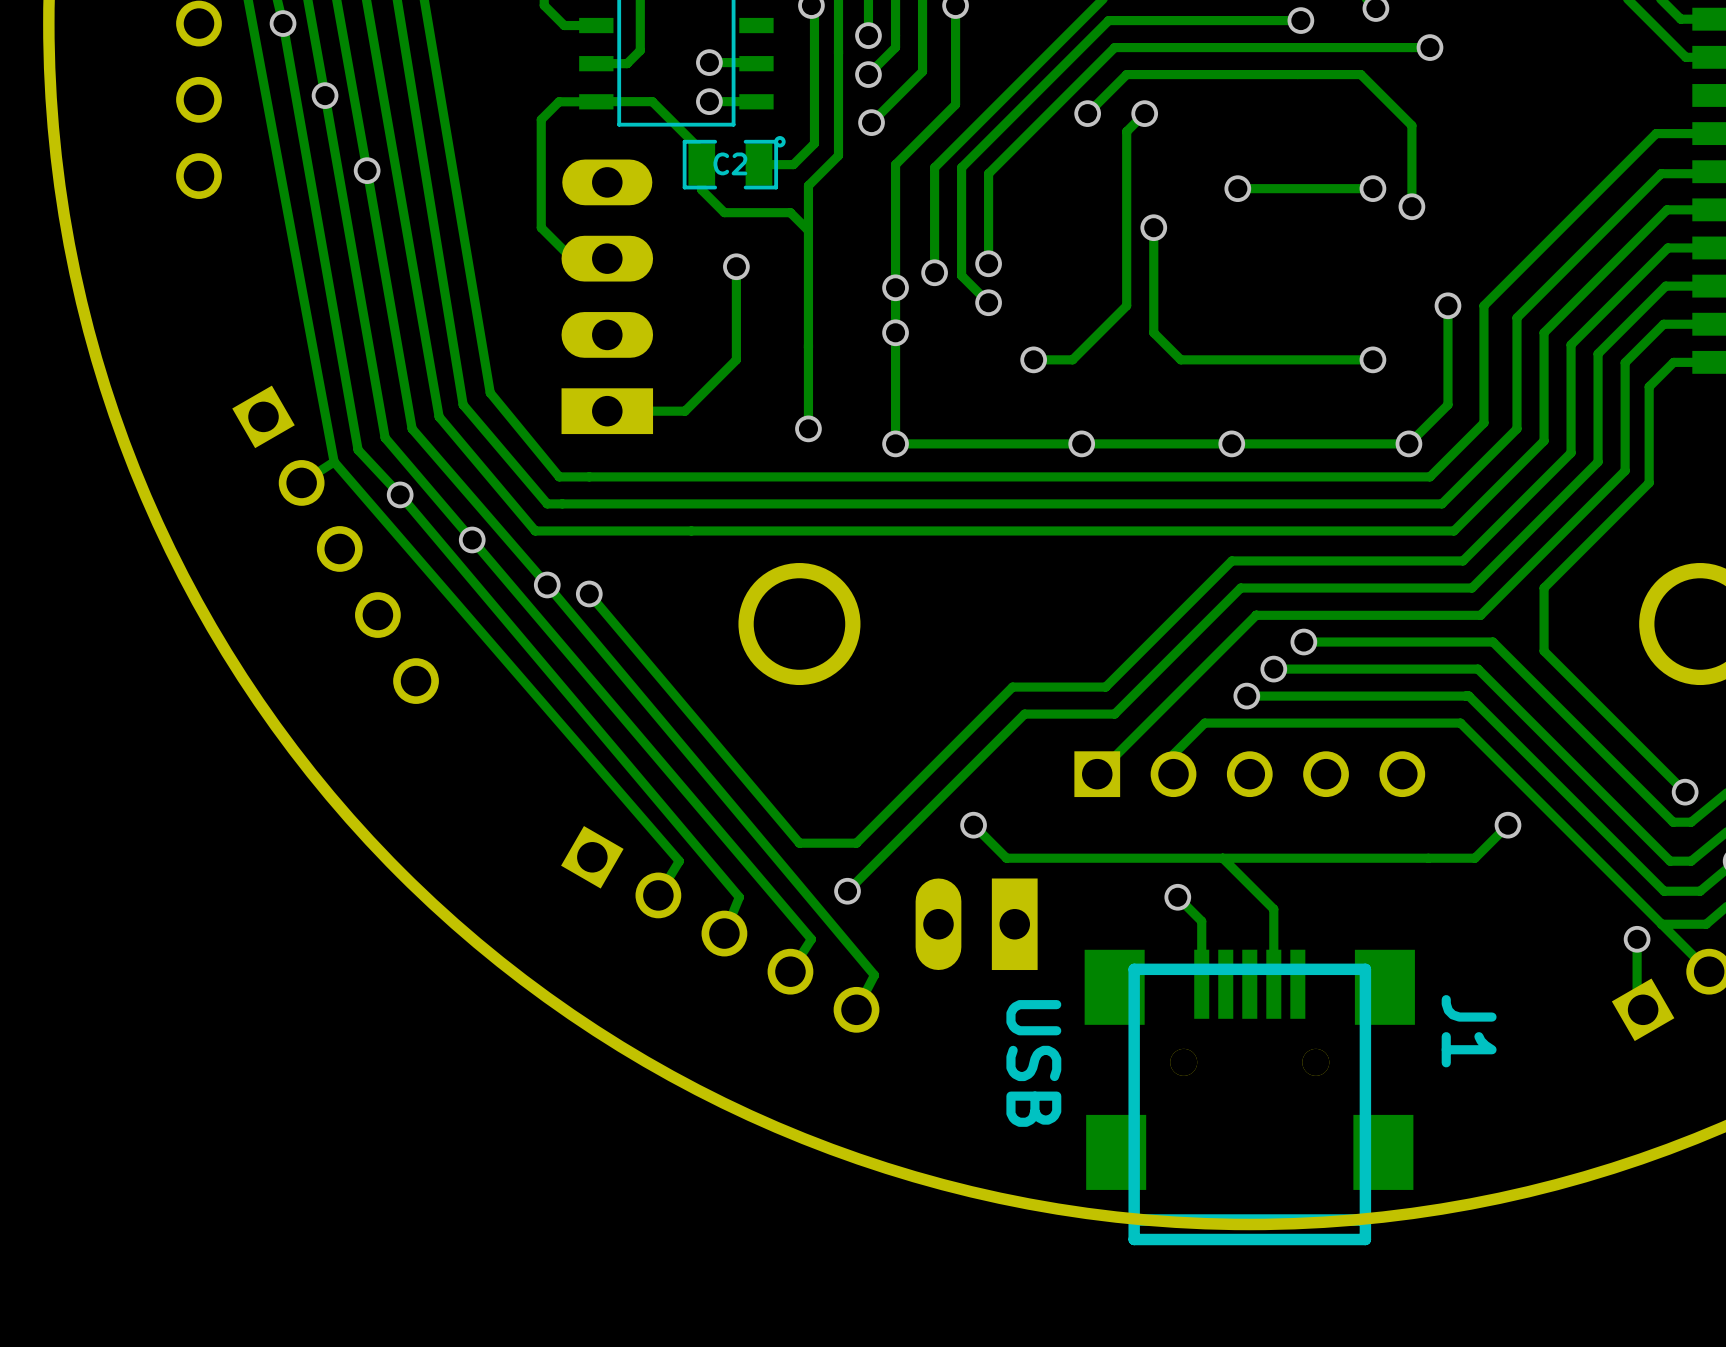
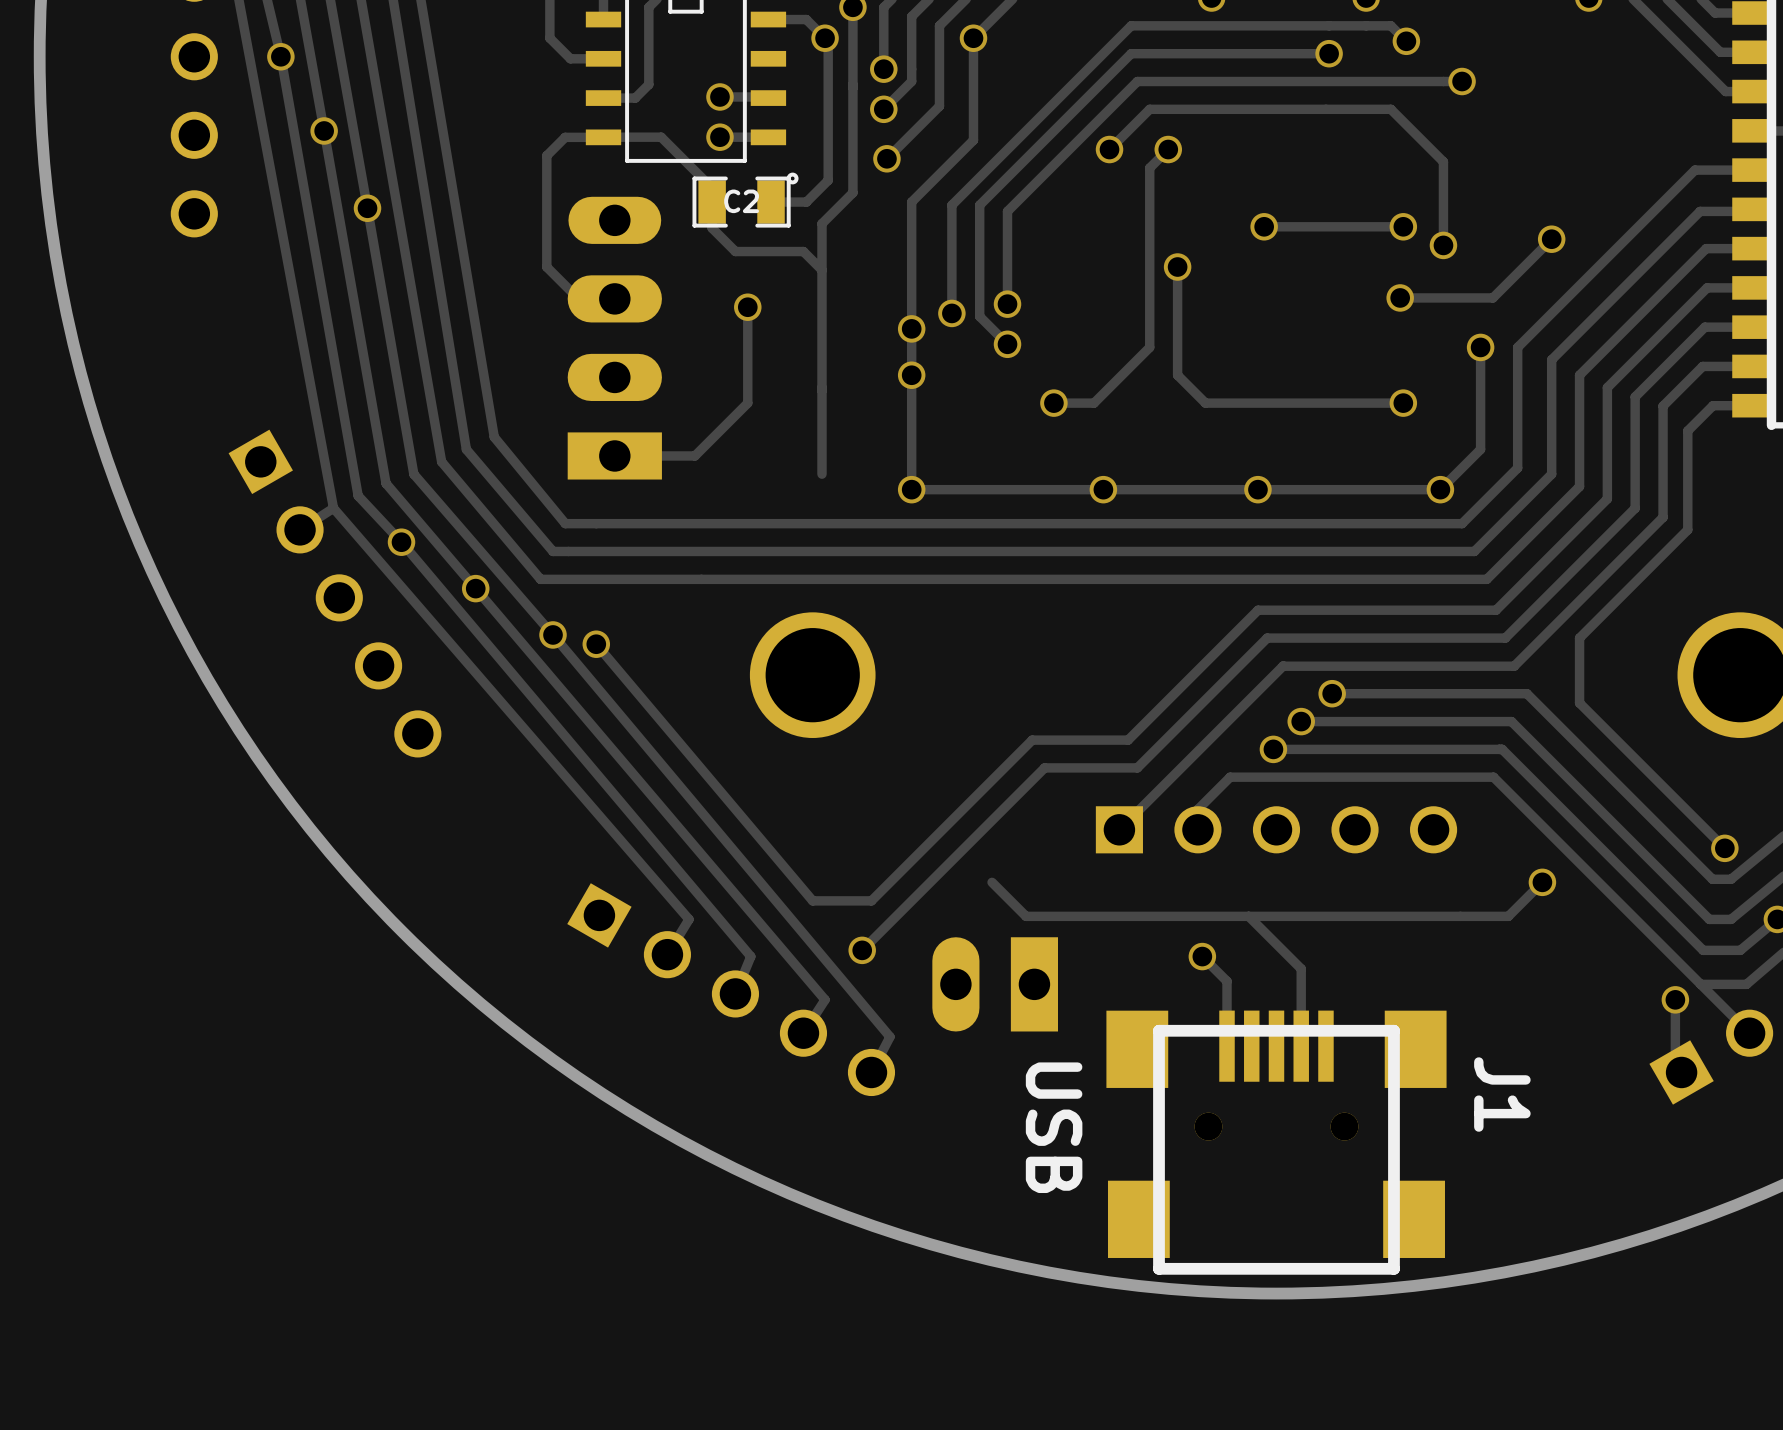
track: none -> (1551, 239) (1492, 297) (1400, 297)
via: none -> (1551, 239)
via: none -> (1400, 297)
via: (808, 428) -> none
via: (973, 825) -> none
J1 footprint: [1084, 949, 1415, 1246] -> [1106, 1010, 1447, 1275]

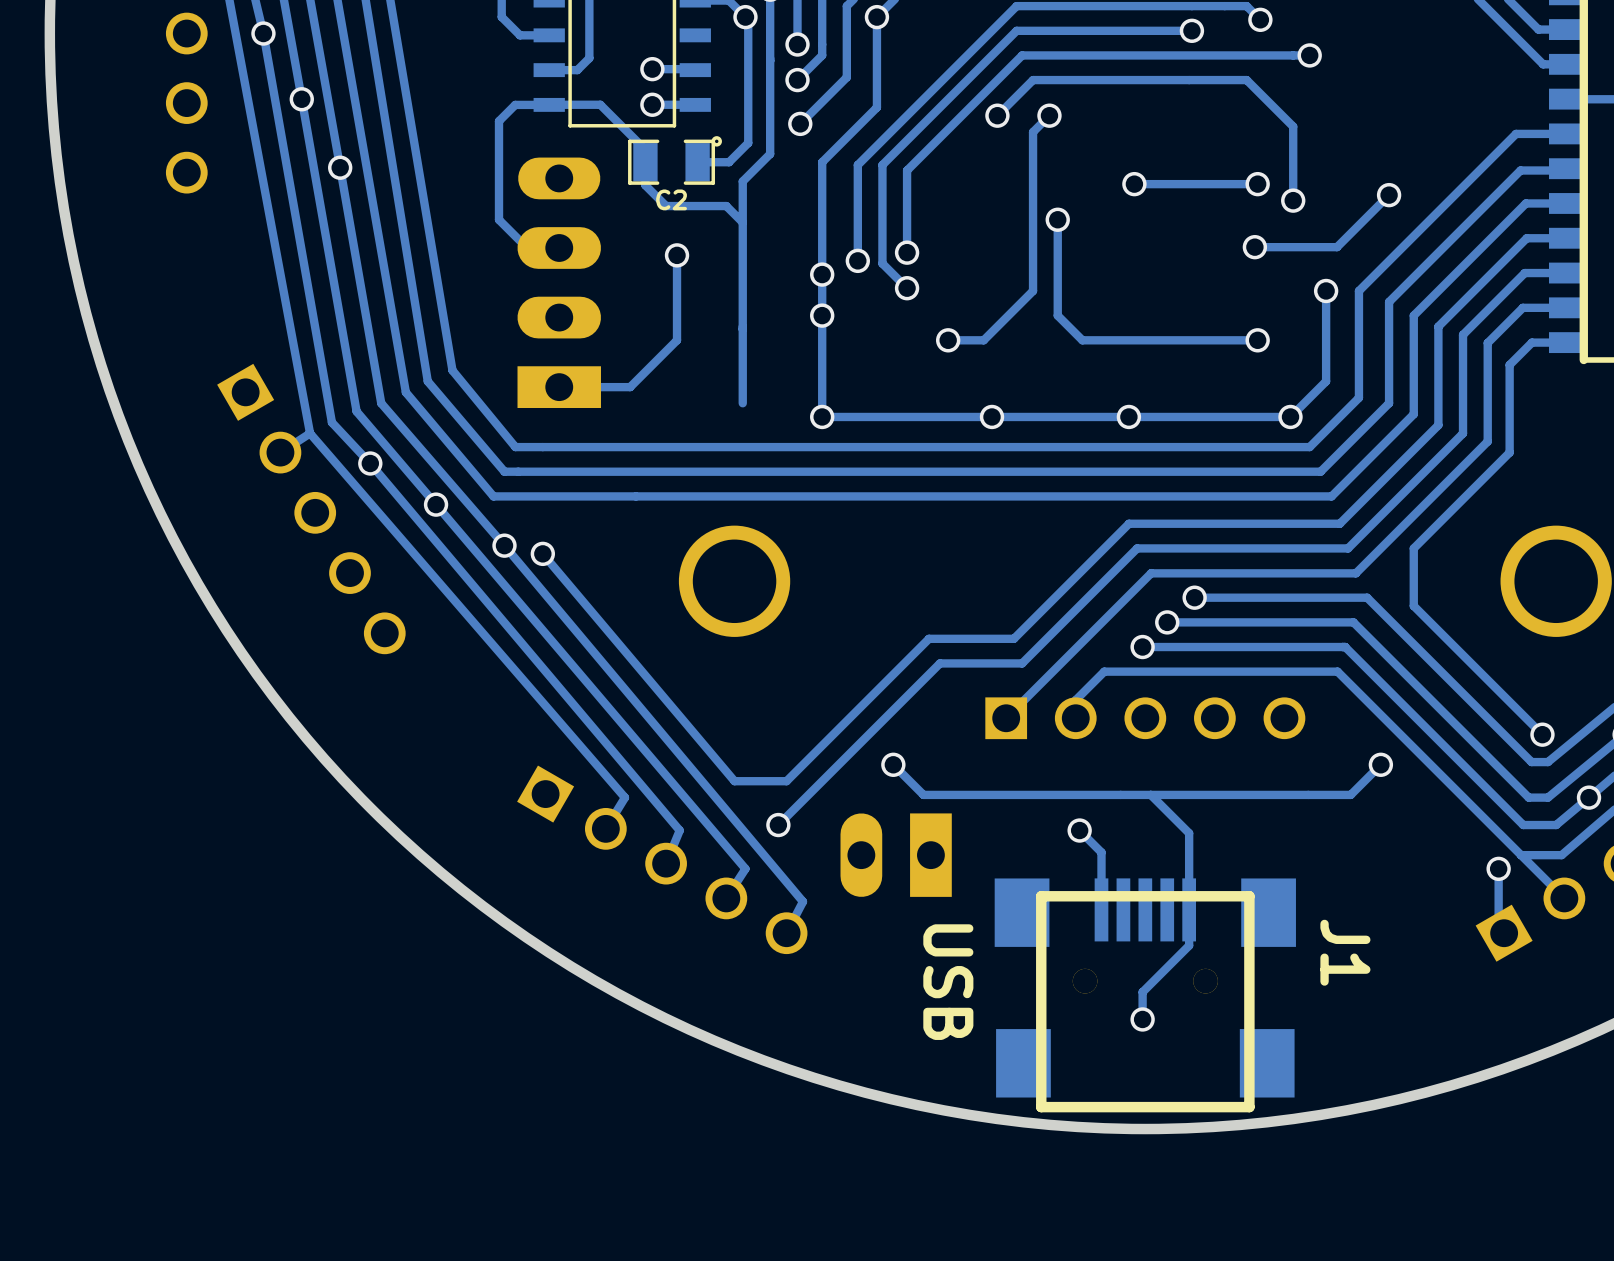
C2 name position: C2 (741, 201) -> C2 (671, 199)
via: none -> (893, 764)
track: (1248, 916) (1301, 968) (1301, 1046) -> none
track: none -> (1150, 794) (1189, 833) (1189, 945) (1142, 992) (1142, 1019)
via: none -> (1142, 1019)

